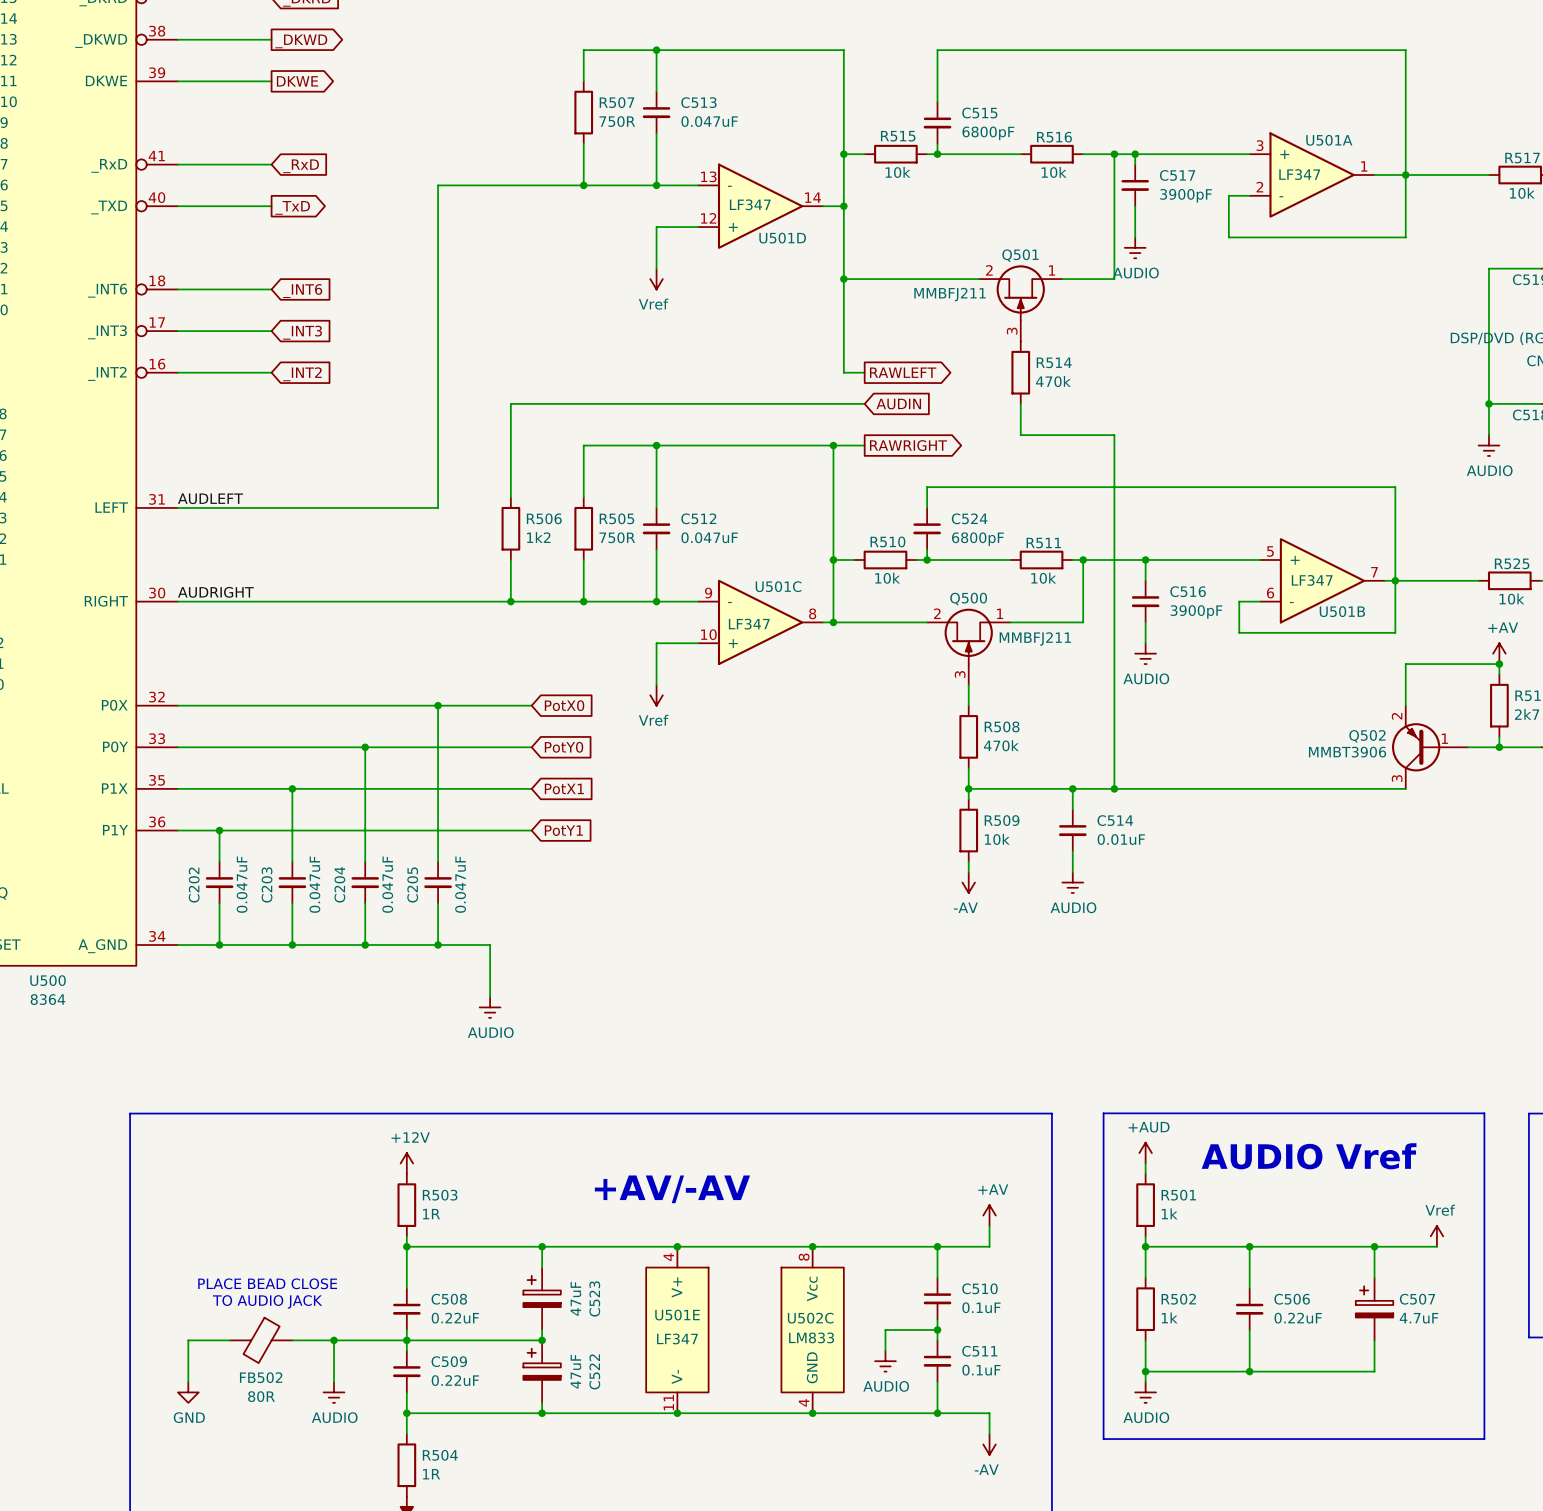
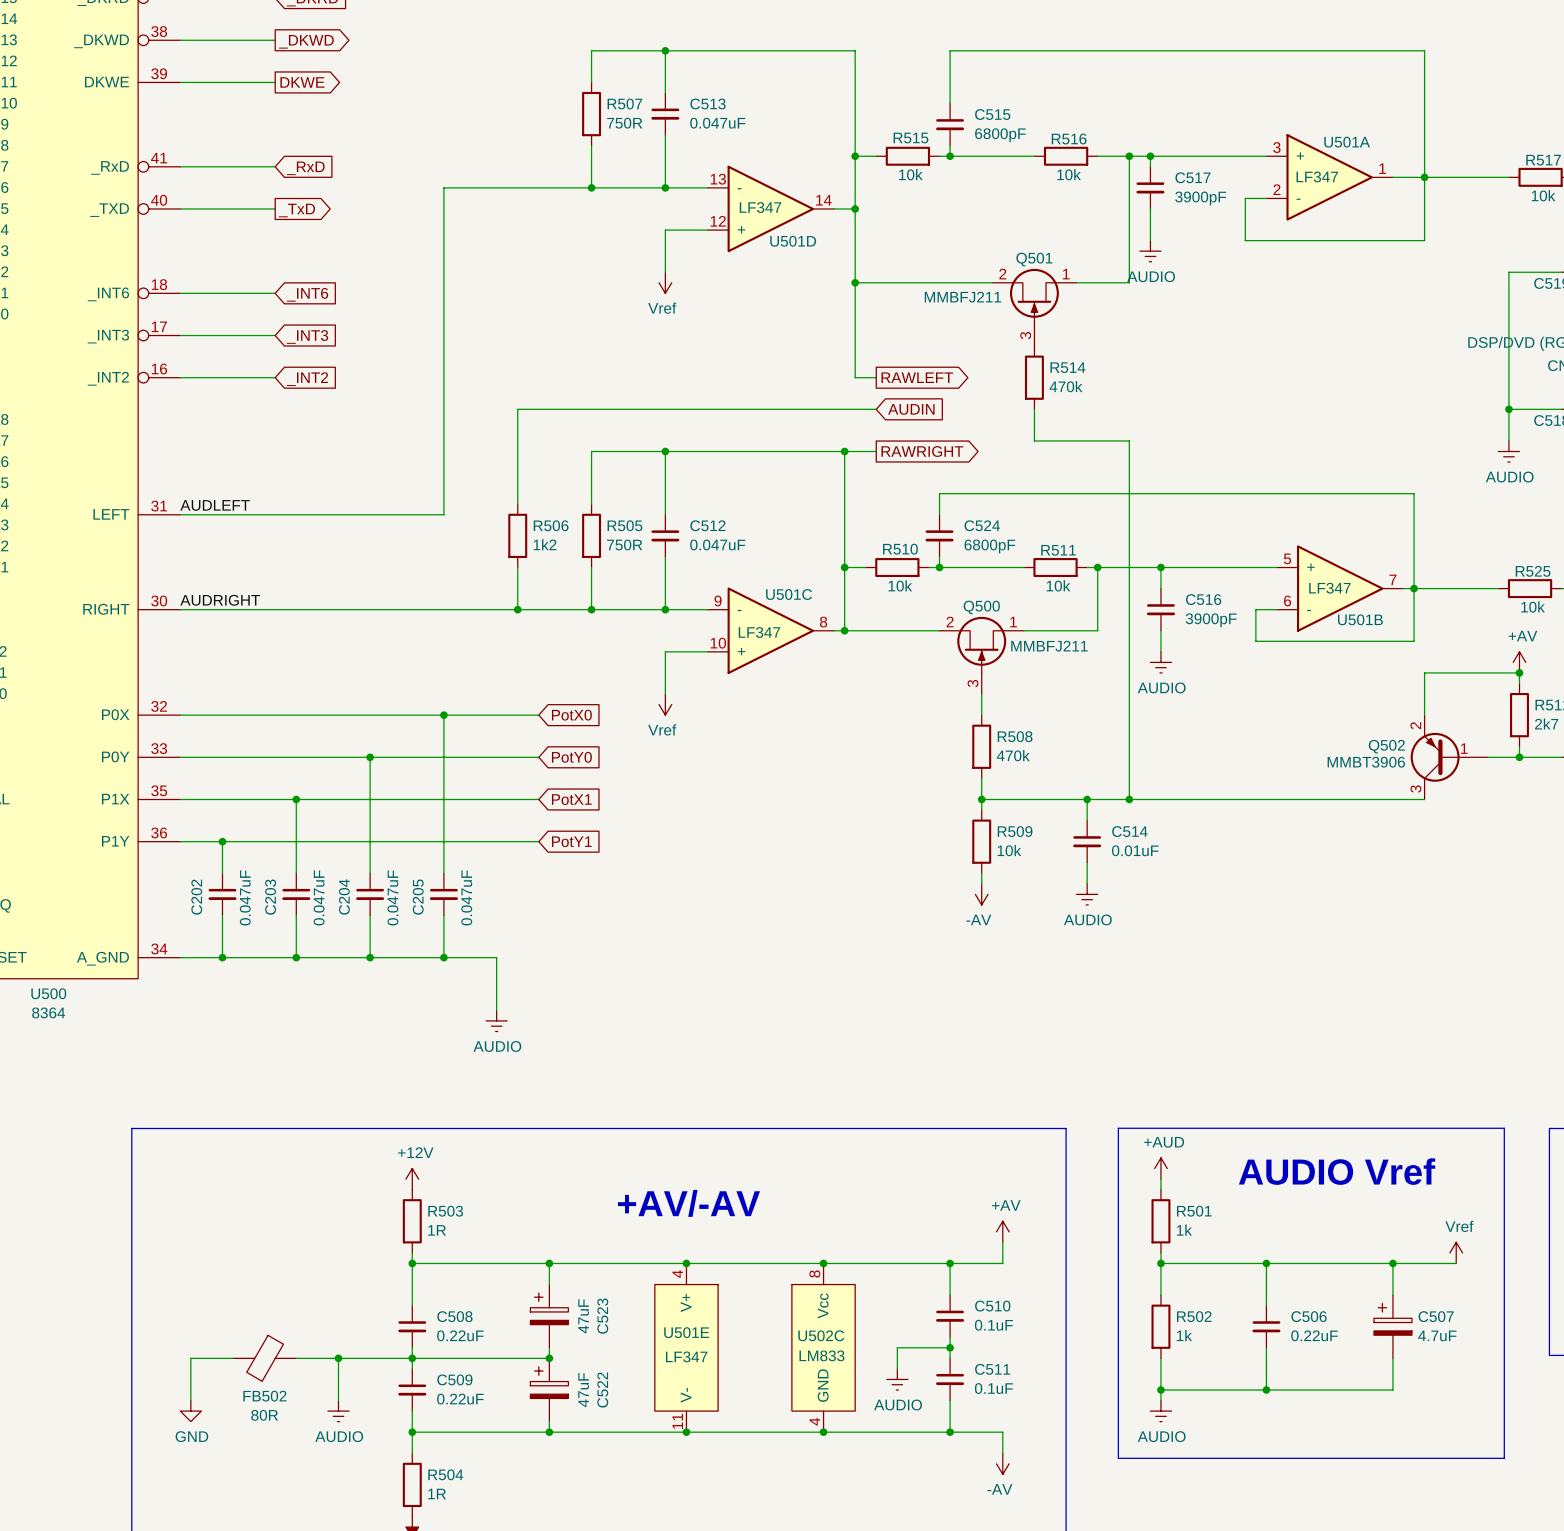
text: PLACE BEAD CLOSE (267, 1283) -> none
text: TO AUDIO JACK (267, 1301) -> none

